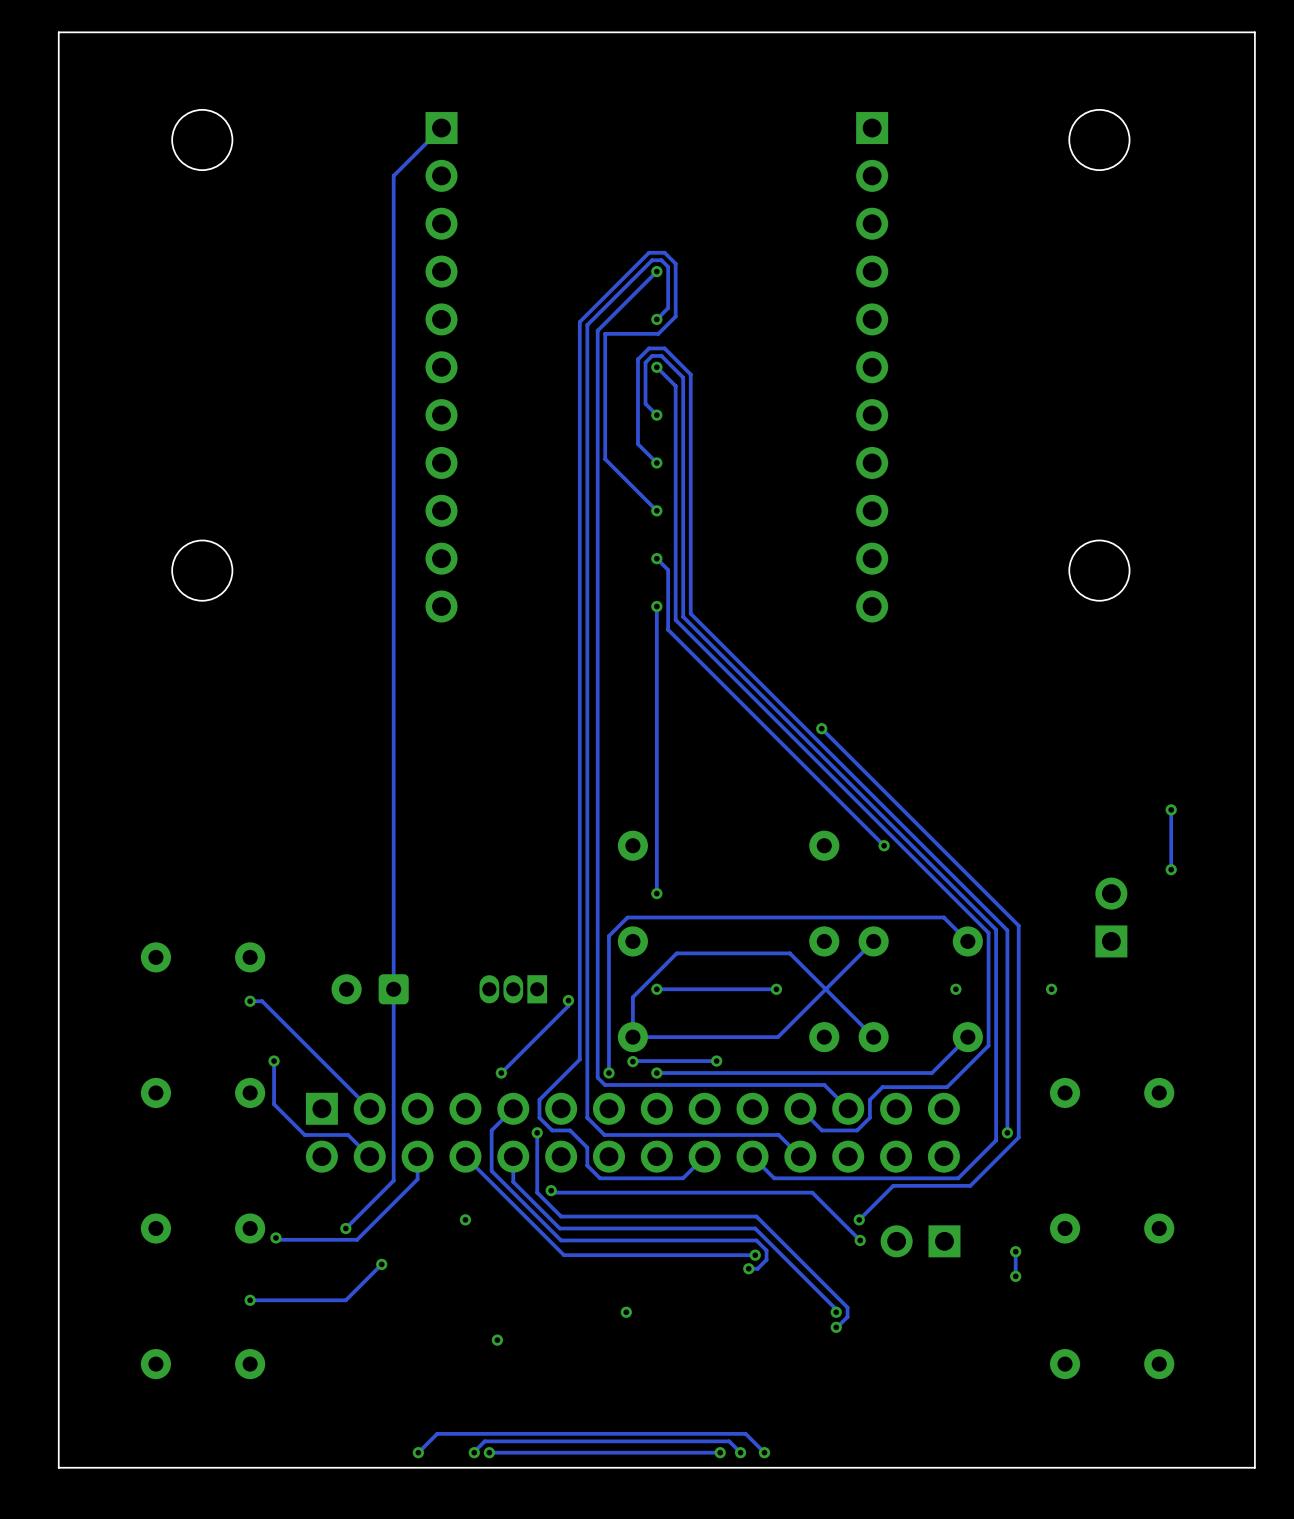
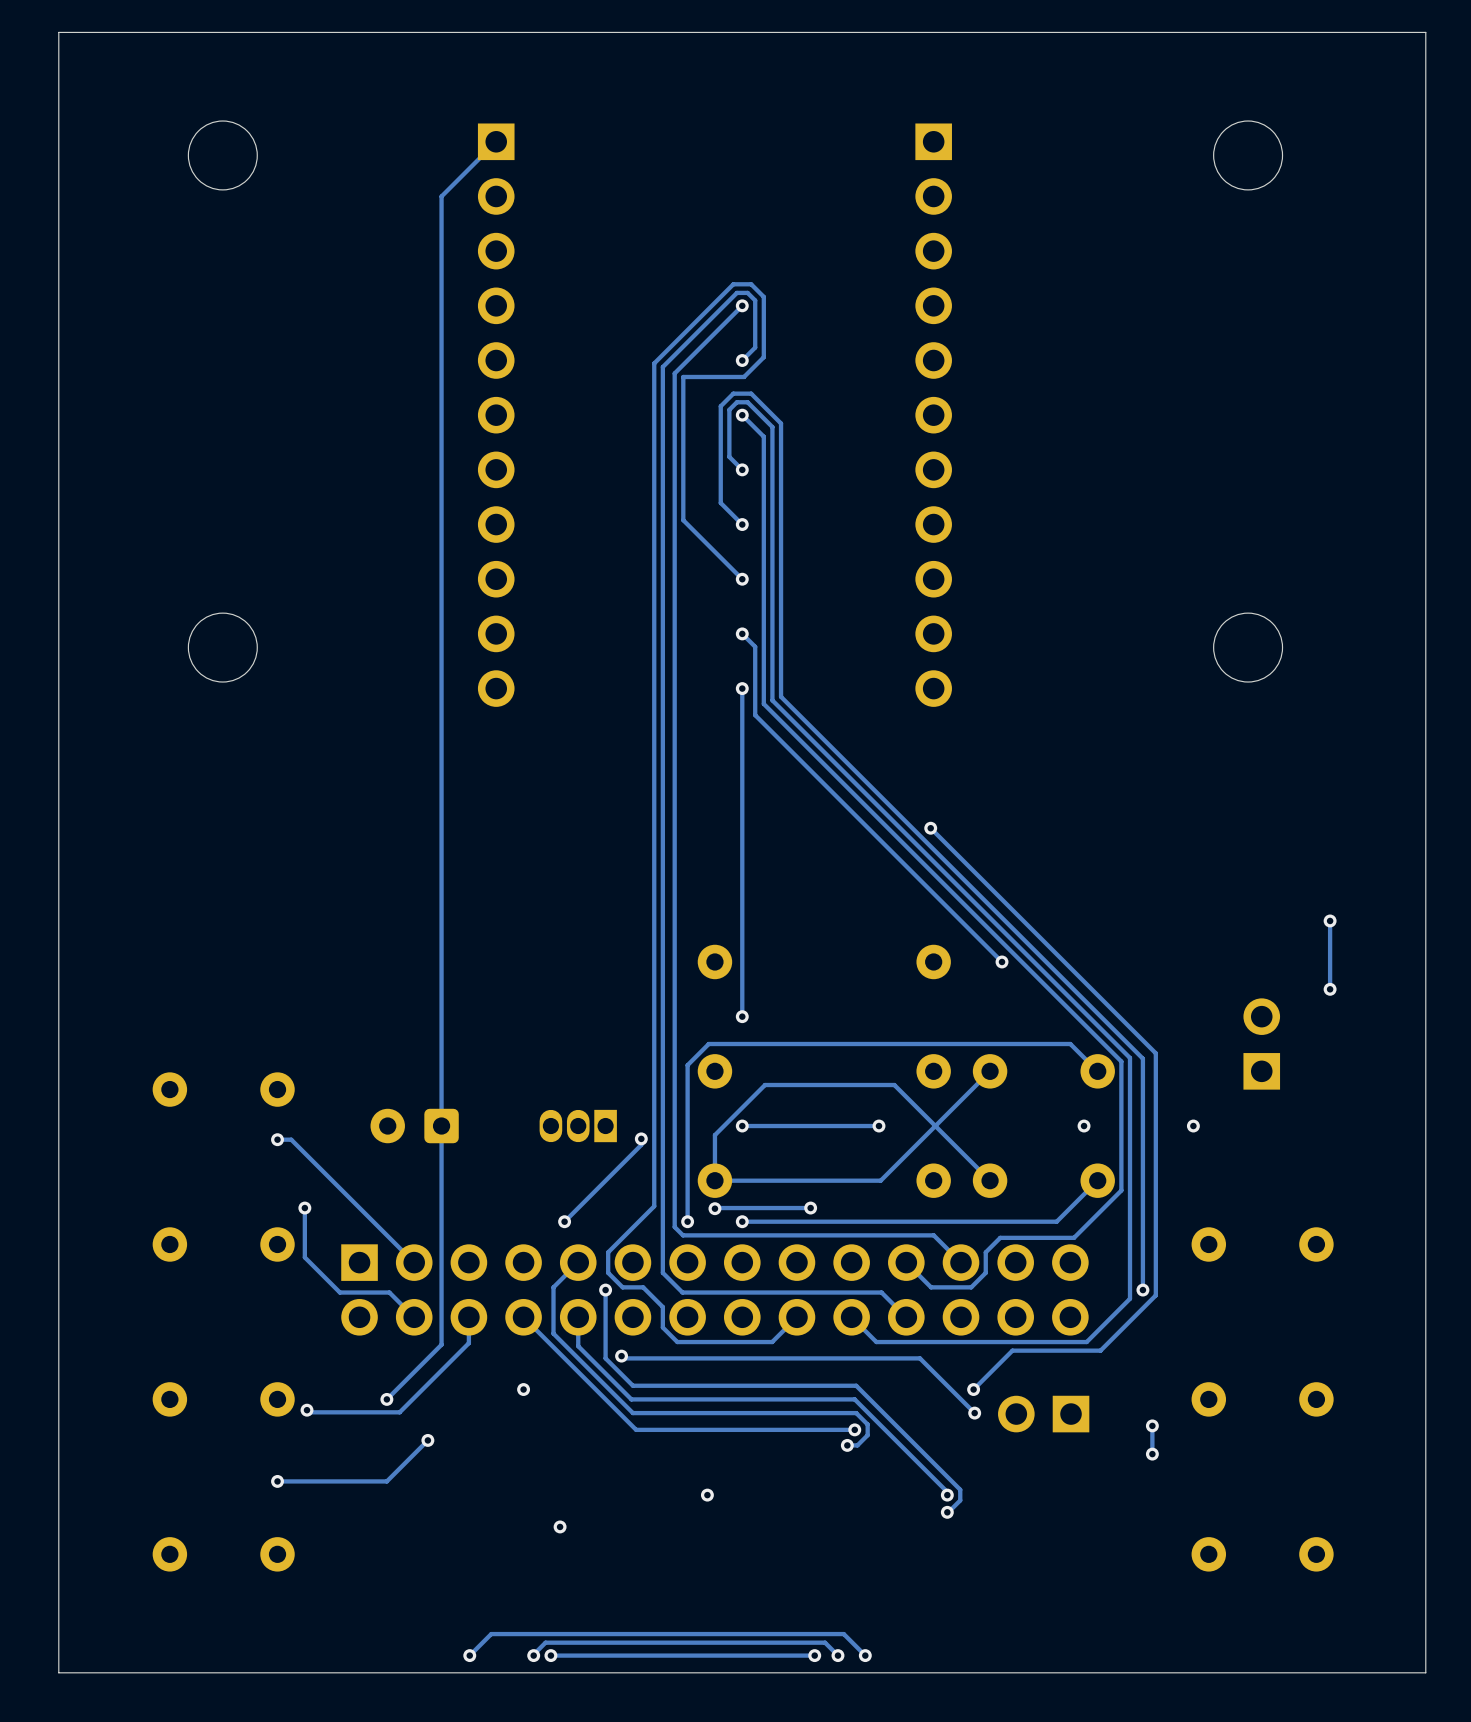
part position: (872, 367) -> (933, 415)

